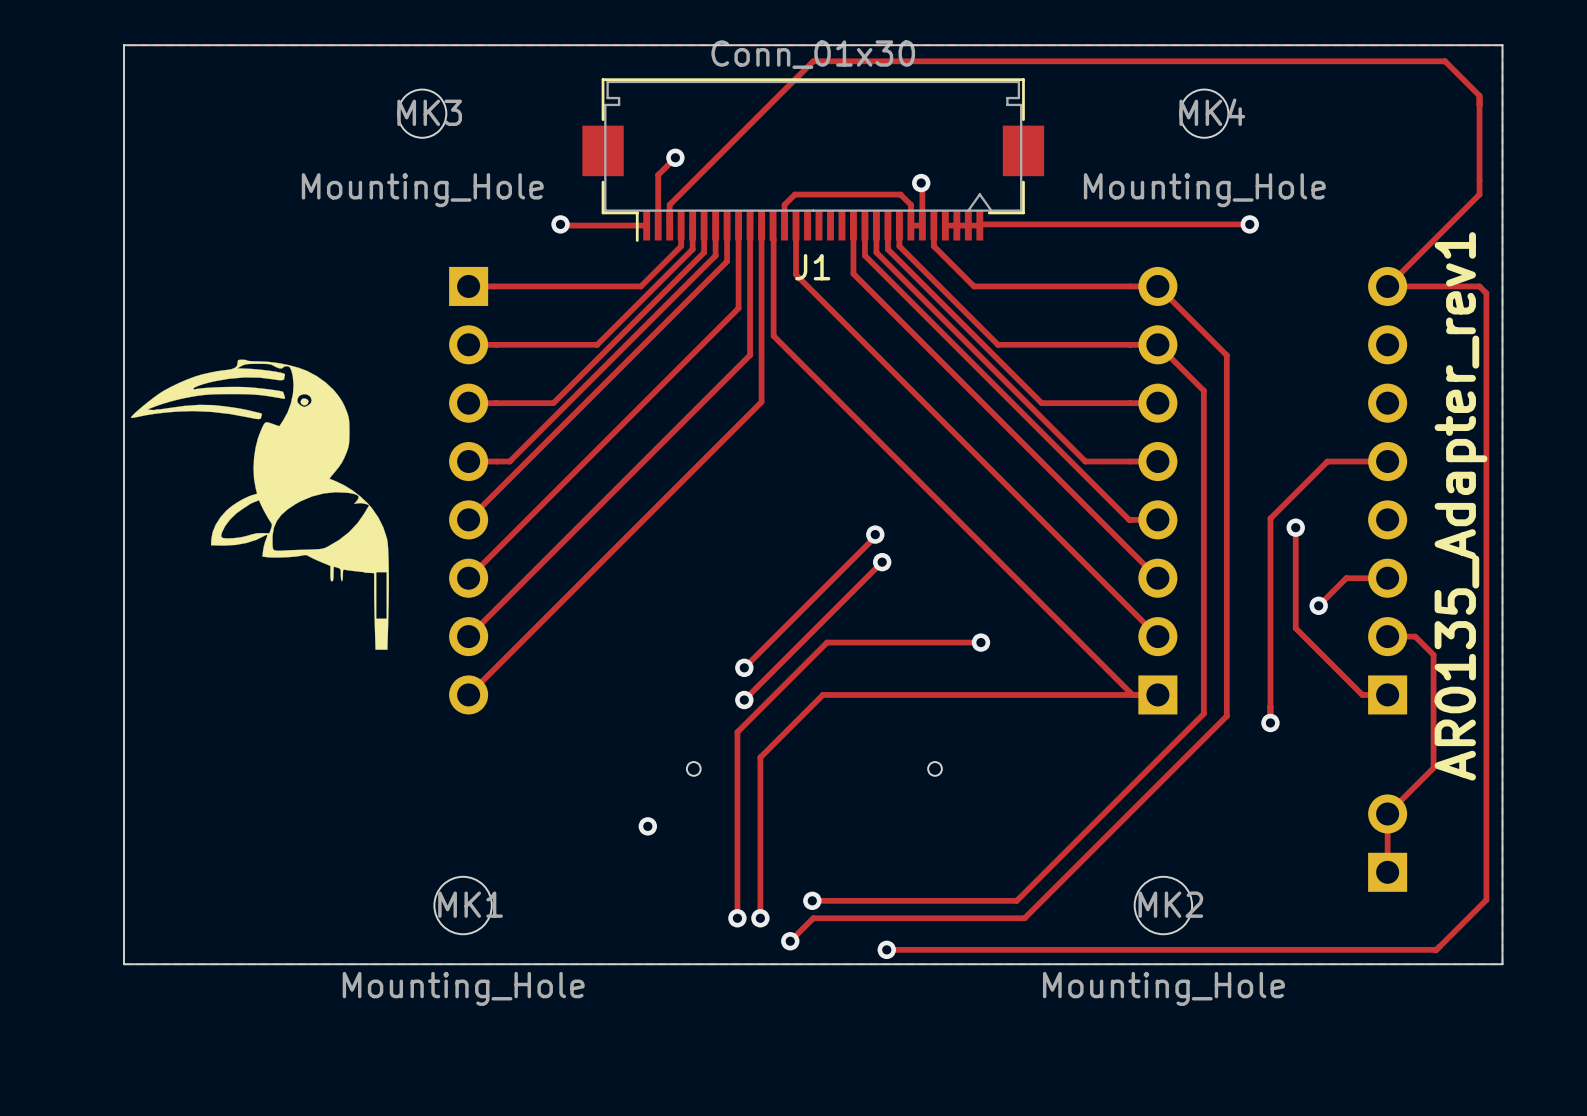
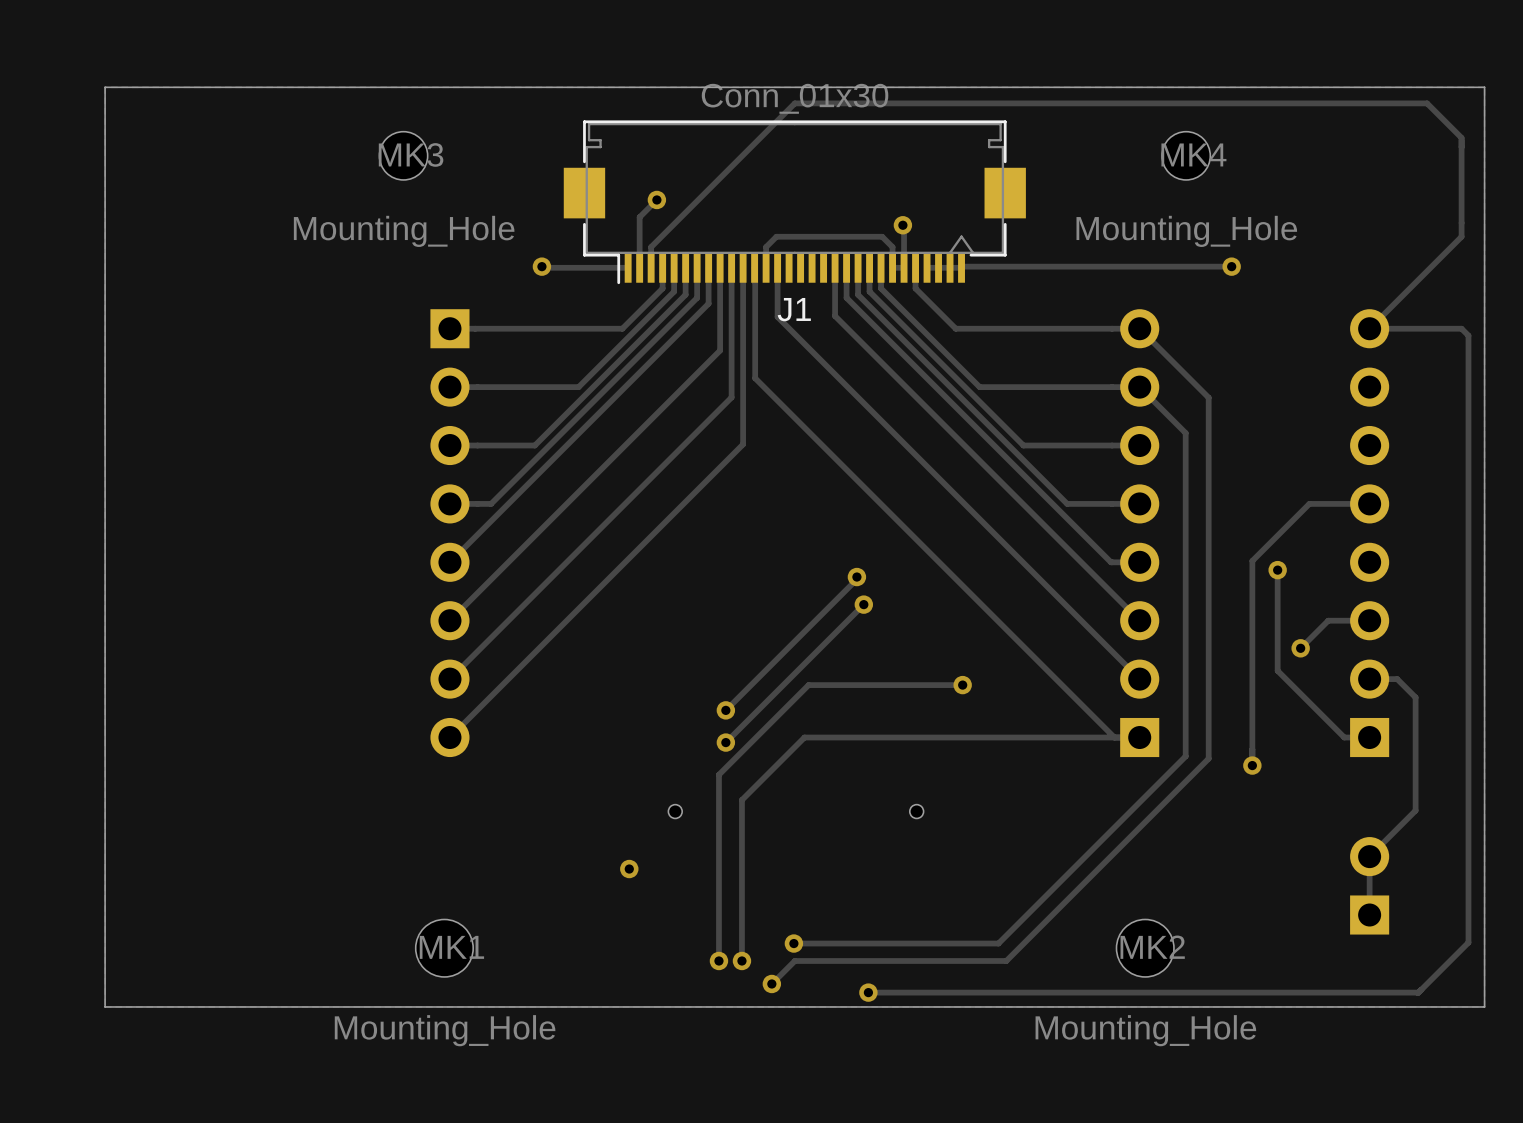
drawing: [130, 359, 389, 650] -> none
text: AR0135_Adapter_rev1 (1461, 506) -> none

